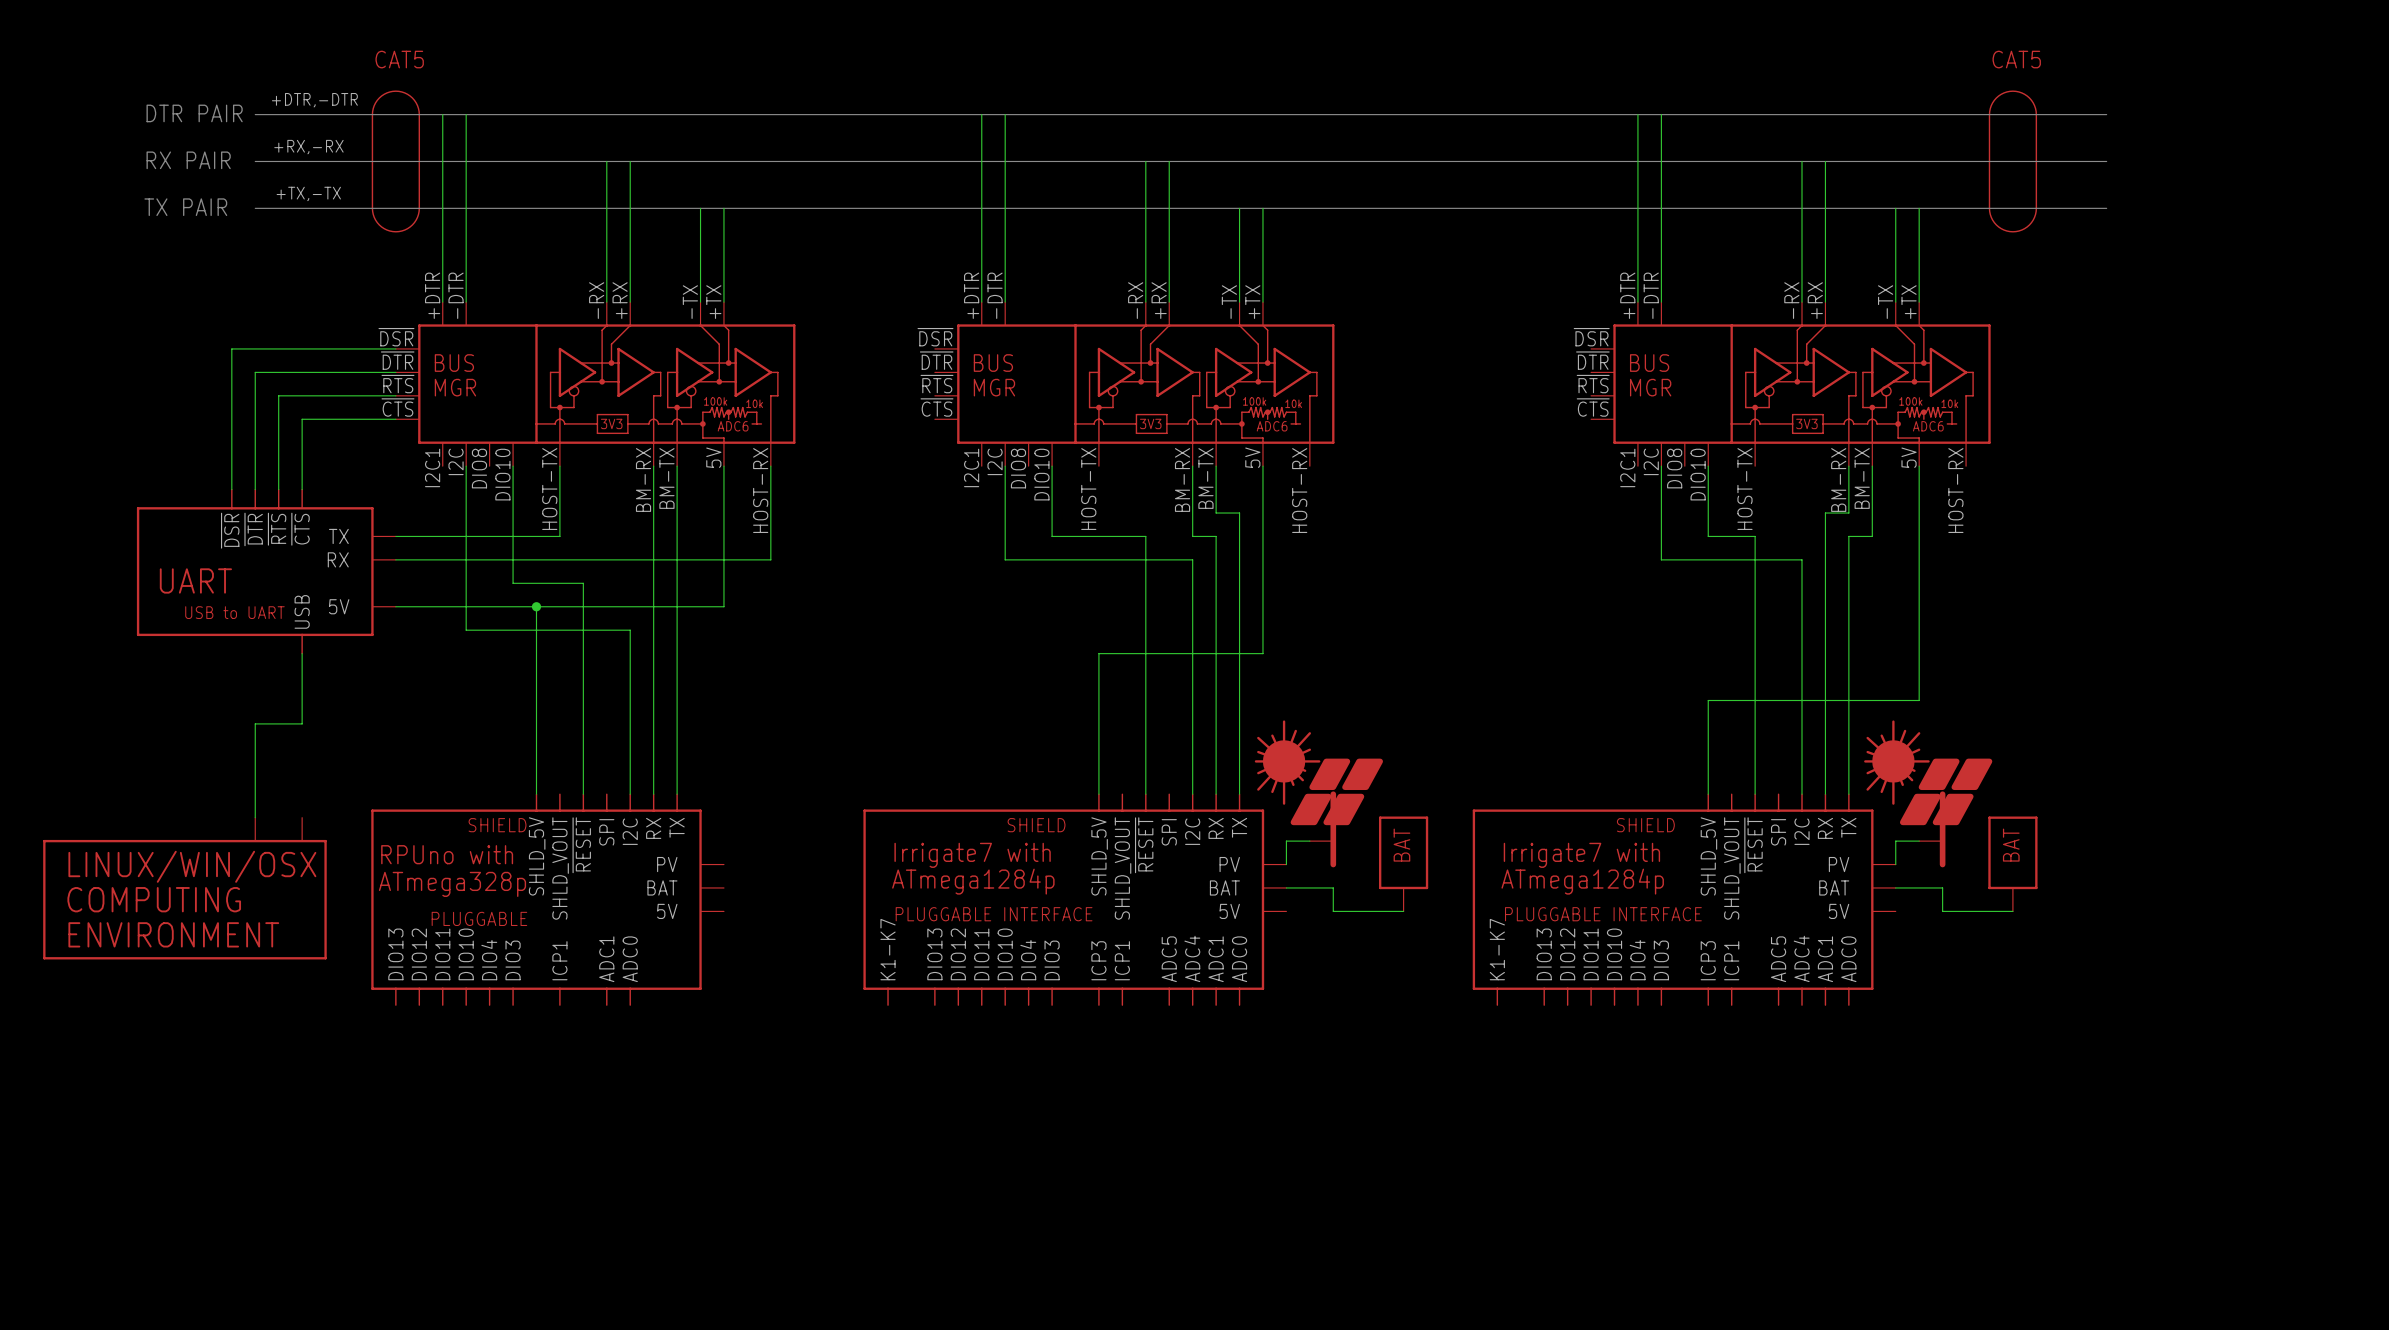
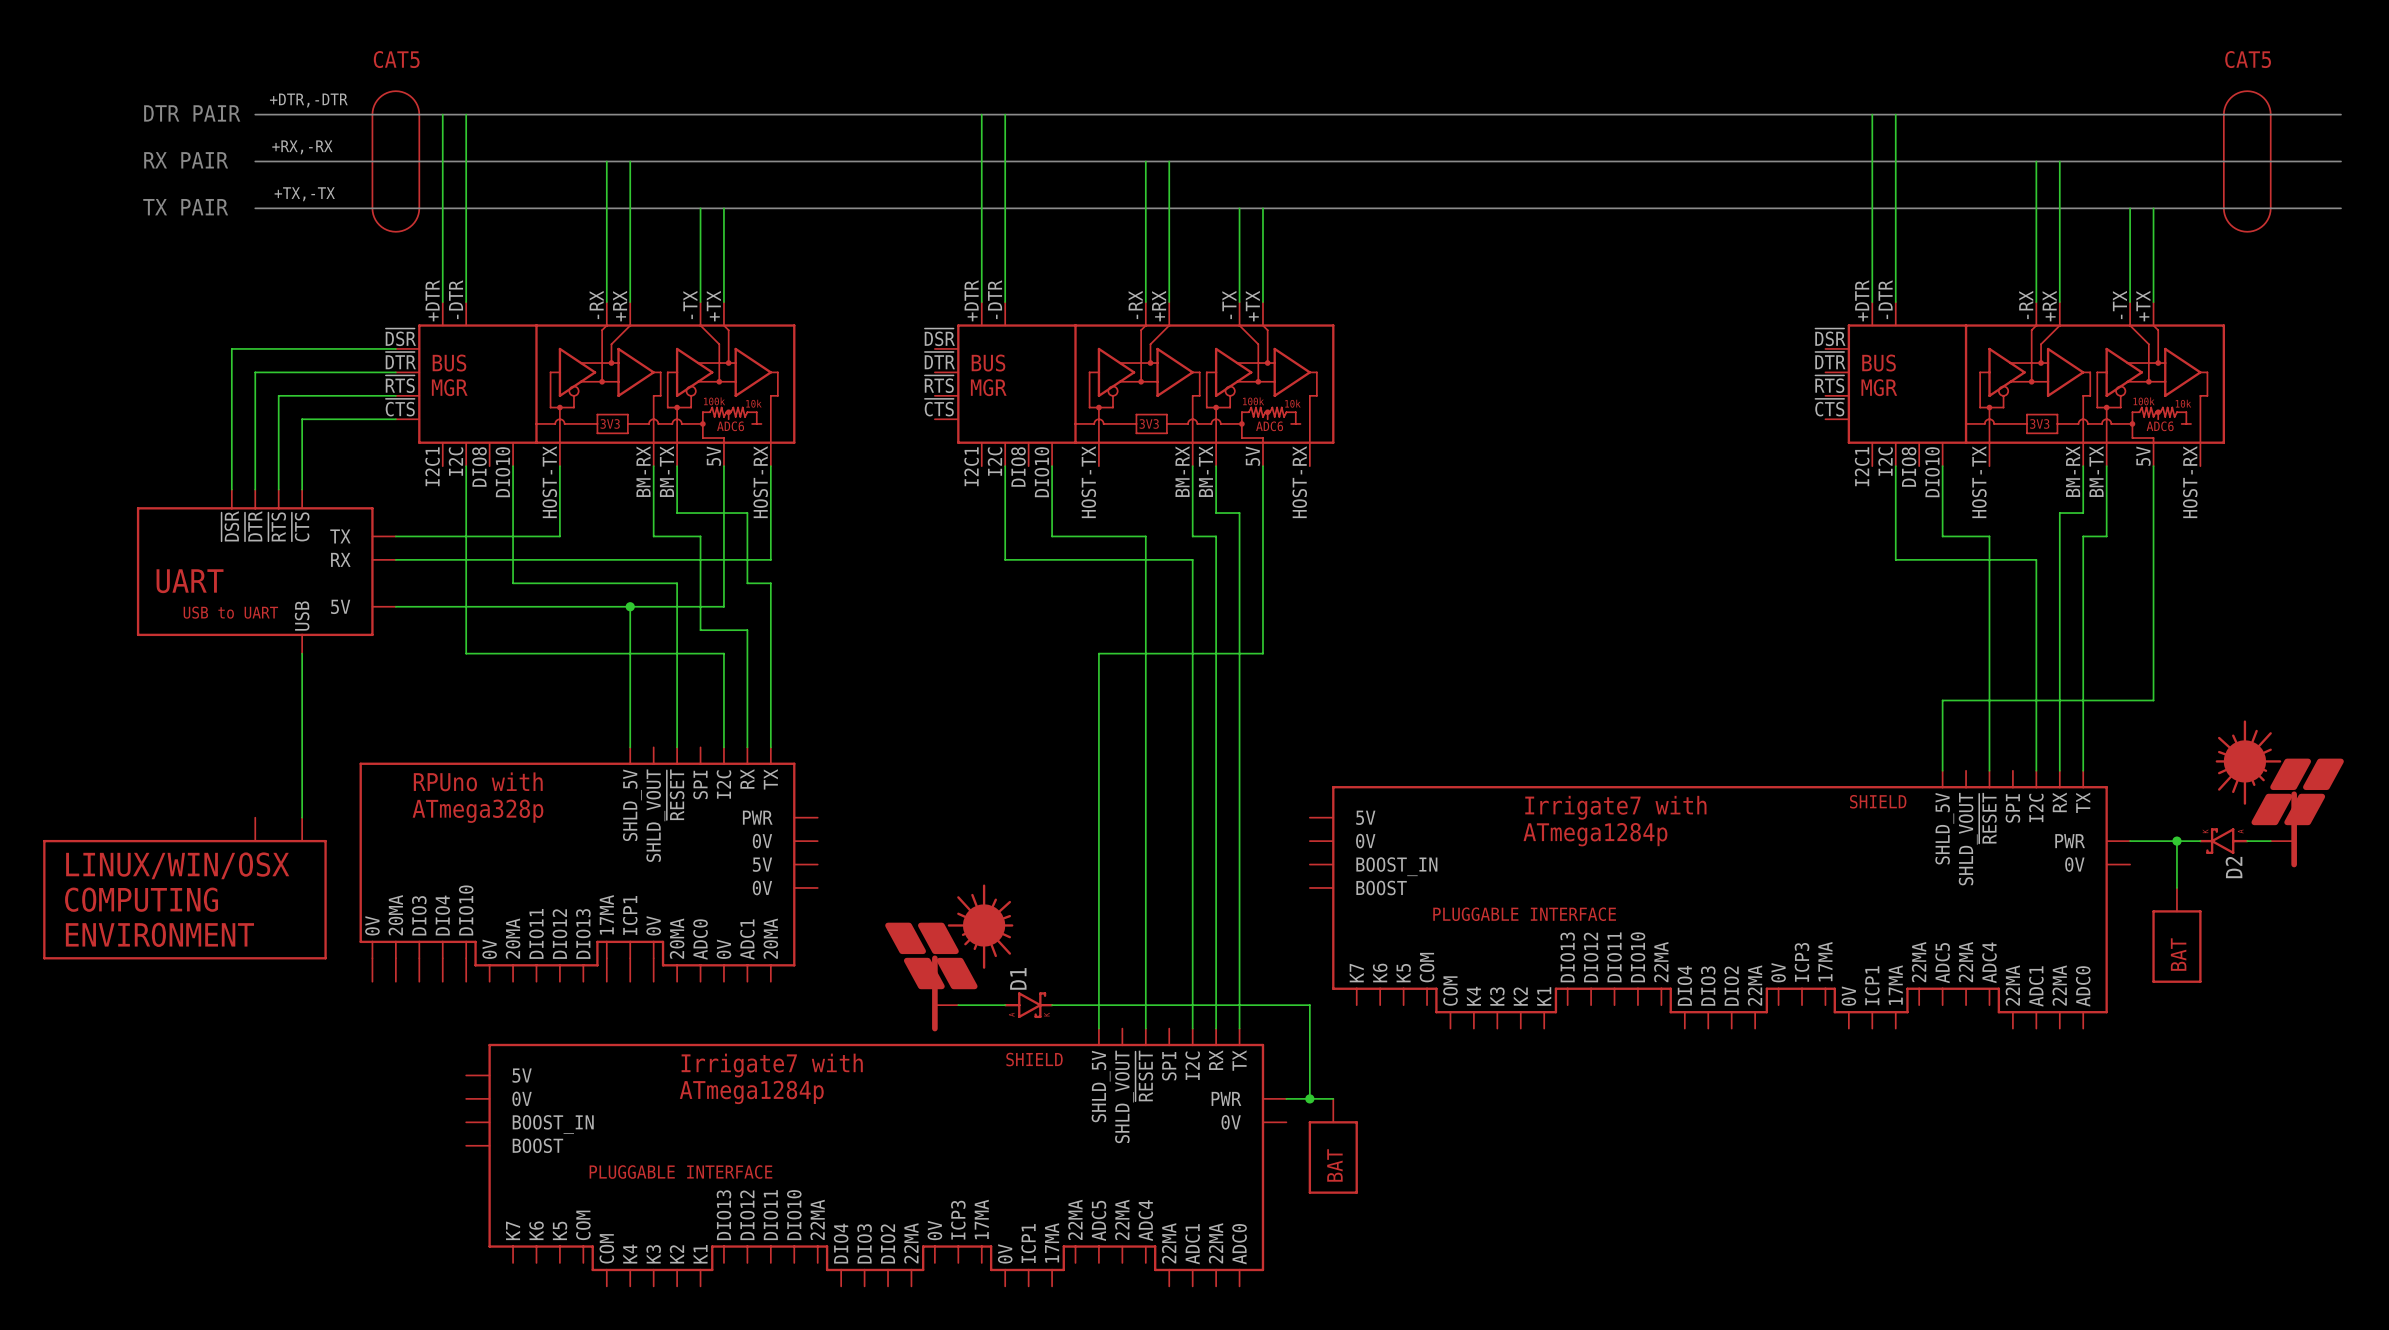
text: CAT5 (2016, 59) -> none
text: none -> CAT5 (2248, 59)
wire: (1637, 114) (1637, 302) -> none
wire: (1661, 114) (1661, 302) -> (1872, 114) (1872, 302)
wire: none -> (1895, 114) (1895, 208)
line: (1989, 114) (1990, 214) (1994, 222) (2001, 228) (2009, 231) (2018, 230) (2029, 224) (2036, 211) (2035, 108) (2027, 96) (2018, 91) (2009, 91) (1996, 98) (1991, 105) (1989, 114) -> none
bus: none -> (2106, 114) (2341, 114)
line: none -> (2223, 114) (2224, 214) (2228, 222) (2235, 228) (2244, 231) (2253, 230) (2263, 224) (2270, 211) (2269, 108) (2261, 96) (2253, 91) (2244, 91) (2230, 98) (2225, 105) (2223, 114)
wire: (1802, 161) (1802, 302) -> none
wire: (1825, 161) (1825, 302) -> (2036, 161) (2036, 302)
wire: none -> (2059, 161) (2059, 302)
bus: none -> (2106, 161) (2341, 161)
wire: (1919, 208) (1919, 302) -> (2130, 208) (2130, 302)
bus: none -> (2106, 208) (2341, 208)
wire: none -> (2153, 208) (2153, 302)
part: (1790, 384) -> none
part: none -> (2025, 384)
wire: (1661, 466) (1661, 559) (1802, 559) (1802, 794) -> none
wire: (1708, 466) (1708, 536) (1755, 536) (1755, 794) -> none
wire: (1848, 466) (1848, 513) (1825, 513) (1825, 794) -> none
wire: (1872, 466) (1872, 536) (1848, 536) (1848, 794) -> none
wire: none -> (1895, 466) (1895, 559) (2036, 559) (2036, 770)
wire: (1919, 466) (1919, 700) (1708, 700) (1708, 794) -> none
wire: none -> (1942, 466) (1942, 536) (1989, 536) (1989, 770)
wire: none -> (2083, 466) (2083, 513) (2059, 513) (2059, 770)
wire: none -> (2106, 466) (2106, 536) (2083, 536) (2083, 770)
wire: none -> (2153, 466) (2153, 700) (1942, 700) (1942, 770)
wire: (677, 513) (677, 583) -> (583, 583) (677, 583)
wire: none -> (677, 513) (747, 513) (747, 583) (770, 583) (770, 747)
wire: (653, 536) (653, 794) -> (653, 536) (700, 536) (700, 630) (747, 630) (747, 747)
wire: (583, 583) (583, 794) -> none
wire: (536, 606) (536, 794) -> none
junction: (536, 606) -> none
wire: none -> (630, 606) (630, 630)
junction: none -> (630, 606)
wire: (466, 630) (630, 630) -> (466, 630) (466, 653) (723, 653) (723, 747)
wire: (302, 723) (255, 723) (255, 817) -> (302, 723) (302, 817)
wire: (630, 747) (630, 794) -> none
wire: (677, 747) (677, 794) -> none
part: (1318, 793) -> none
part: (1928, 793) -> none
part: none -> (2279, 793)
wire: none -> (1098, 794) (1098, 1028)
wire: none -> (1145, 794) (1145, 1028)
wire: none -> (1192, 794) (1192, 1028)
wire: none -> (1216, 794) (1216, 1028)
wire: none -> (1239, 794) (1239, 1028)
wire: (1309, 841) (1286, 841) (1286, 864) -> none
wire: (1919, 841) (1895, 841) (1895, 864) -> none
wire: none -> (2130, 841) (2200, 841)
wire: none -> (2176, 841) (2176, 887)
junction: none -> (2176, 841)
D2: none -> (2223, 841)
wire: none -> (2247, 841) (2270, 841)
part: (1403, 863) -> none
part: (2012, 863) -> none
part: none -> (588, 864)
wire: (1286, 887) (1333, 887) (1333, 911) (1403, 911) -> none
wire: (1895, 887) (1942, 887) (1942, 911) (2012, 911) -> none
part: (547, 899) -> none
part: (1074, 899) -> none
part: (1684, 899) -> none
part: none -> (1719, 899)
part: none -> (2176, 935)
part: none -> (949, 957)
wire: none -> (958, 1005) (1005, 1005)
D1: none -> (1028, 1005)
wire: none -> (1052, 1005) (1309, 1005) (1309, 1098)
wire: none -> (1286, 1098) (1333, 1098)
junction: none -> (1309, 1098)
part: none -> (1333, 1146)
part: none -> (876, 1157)

